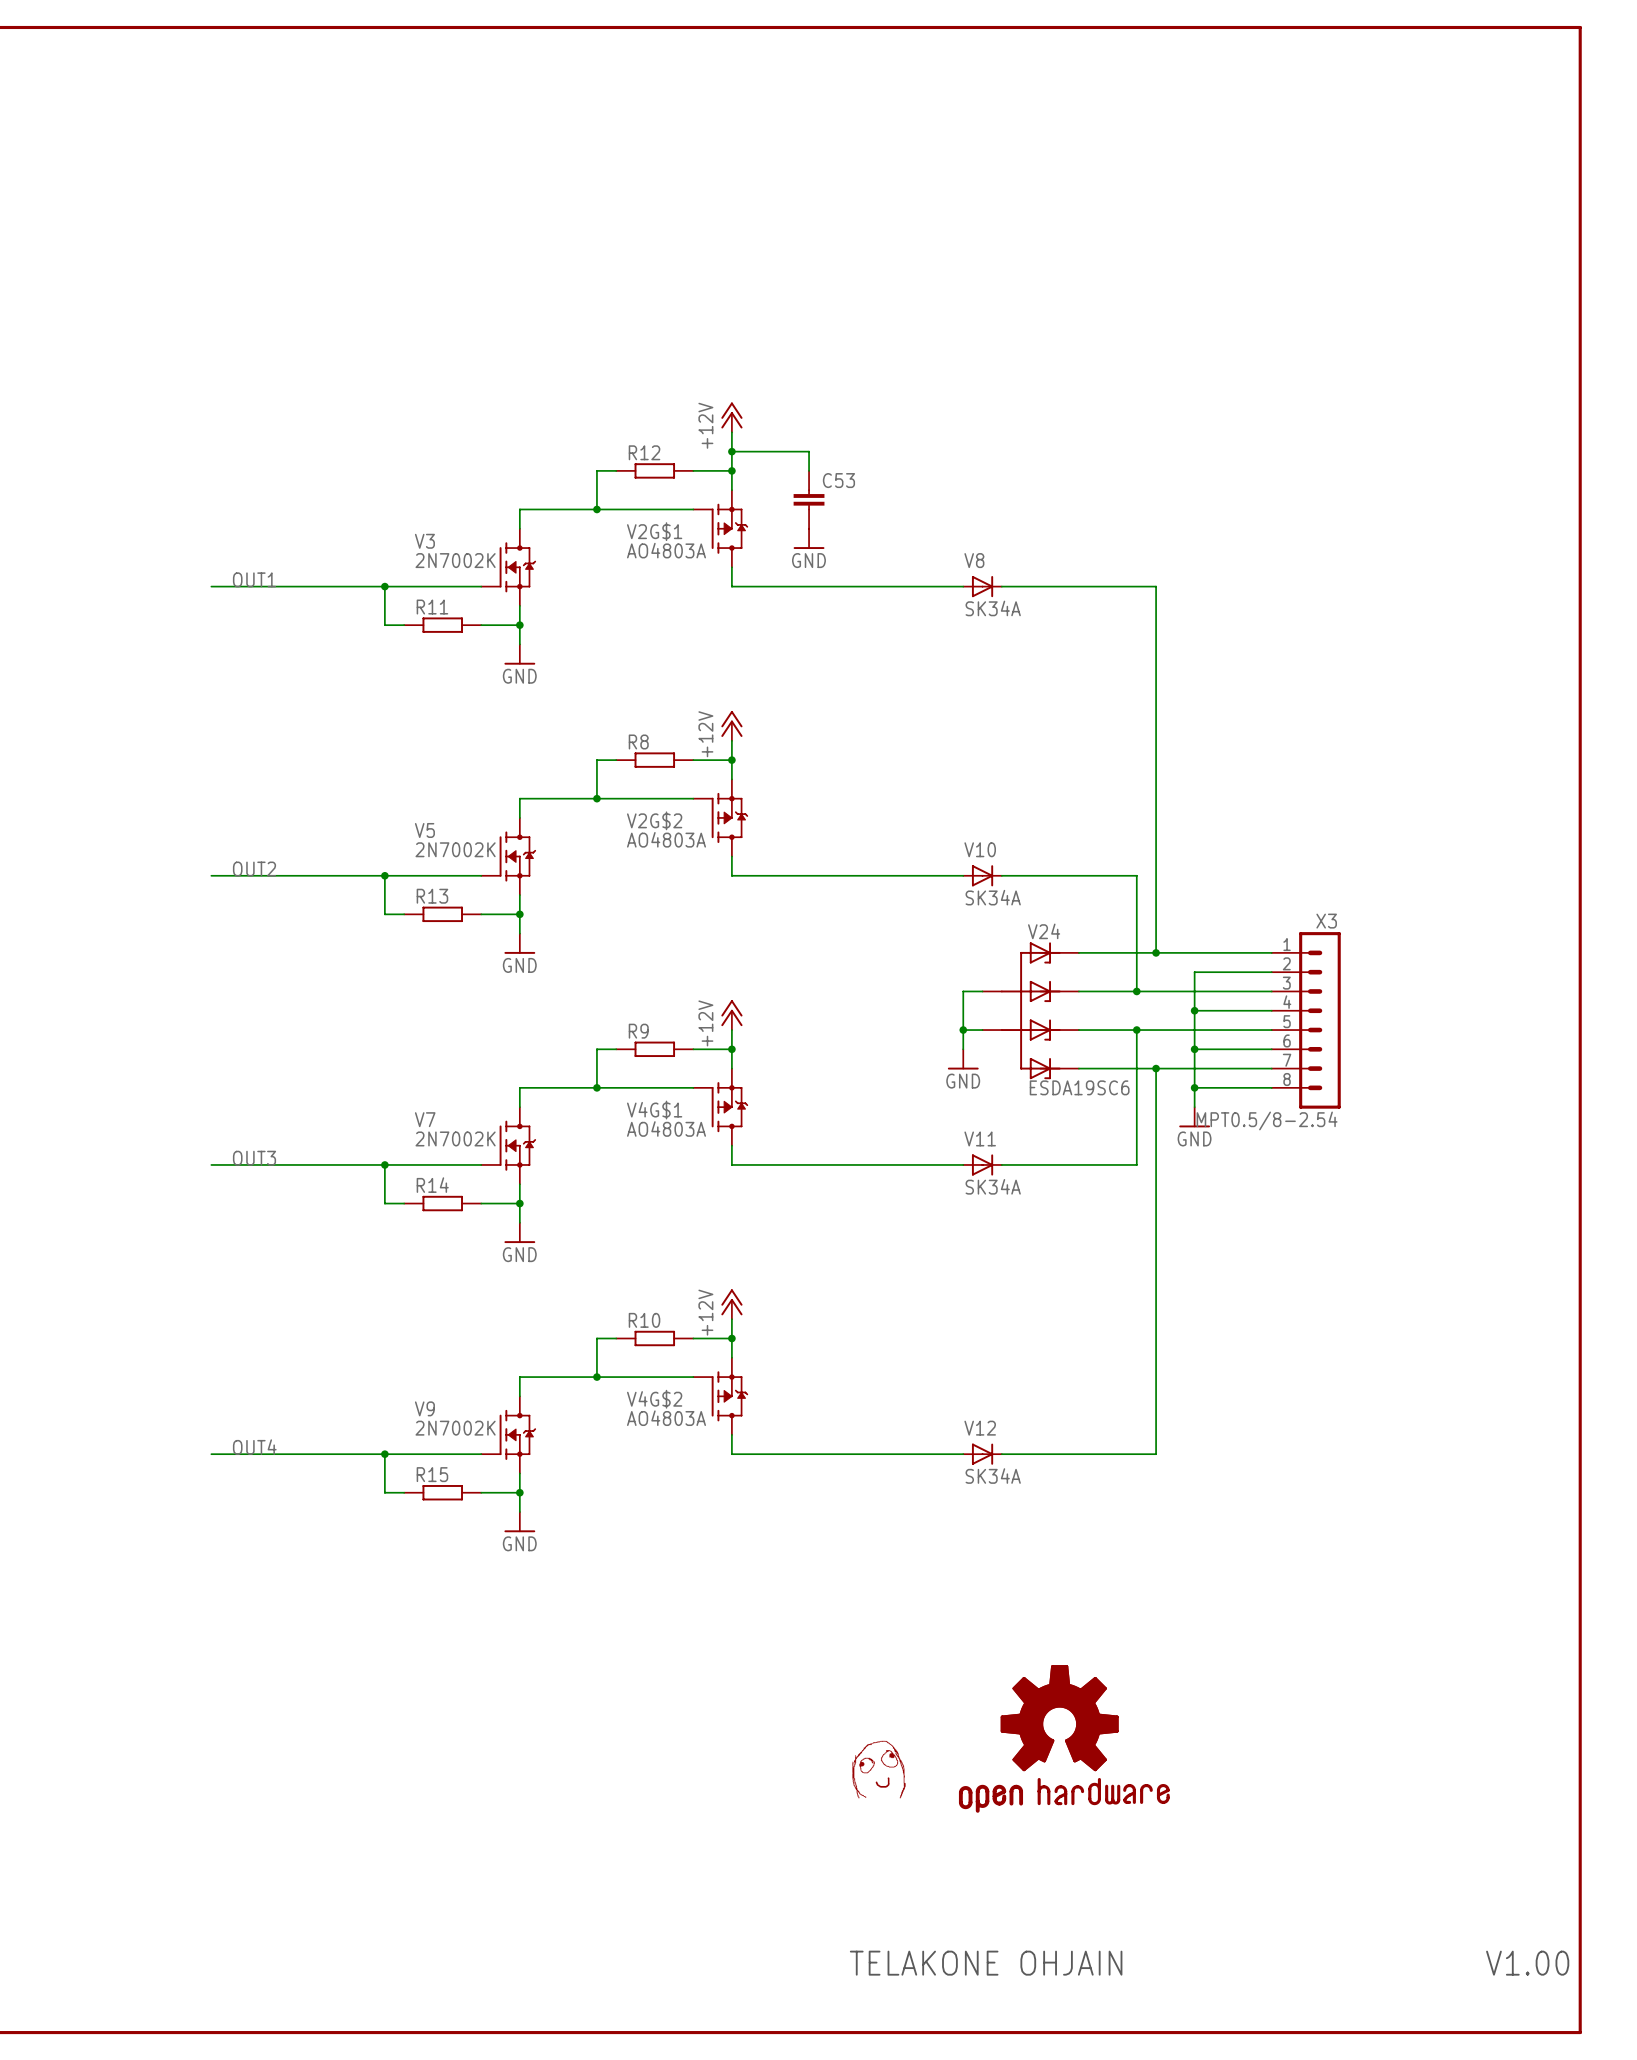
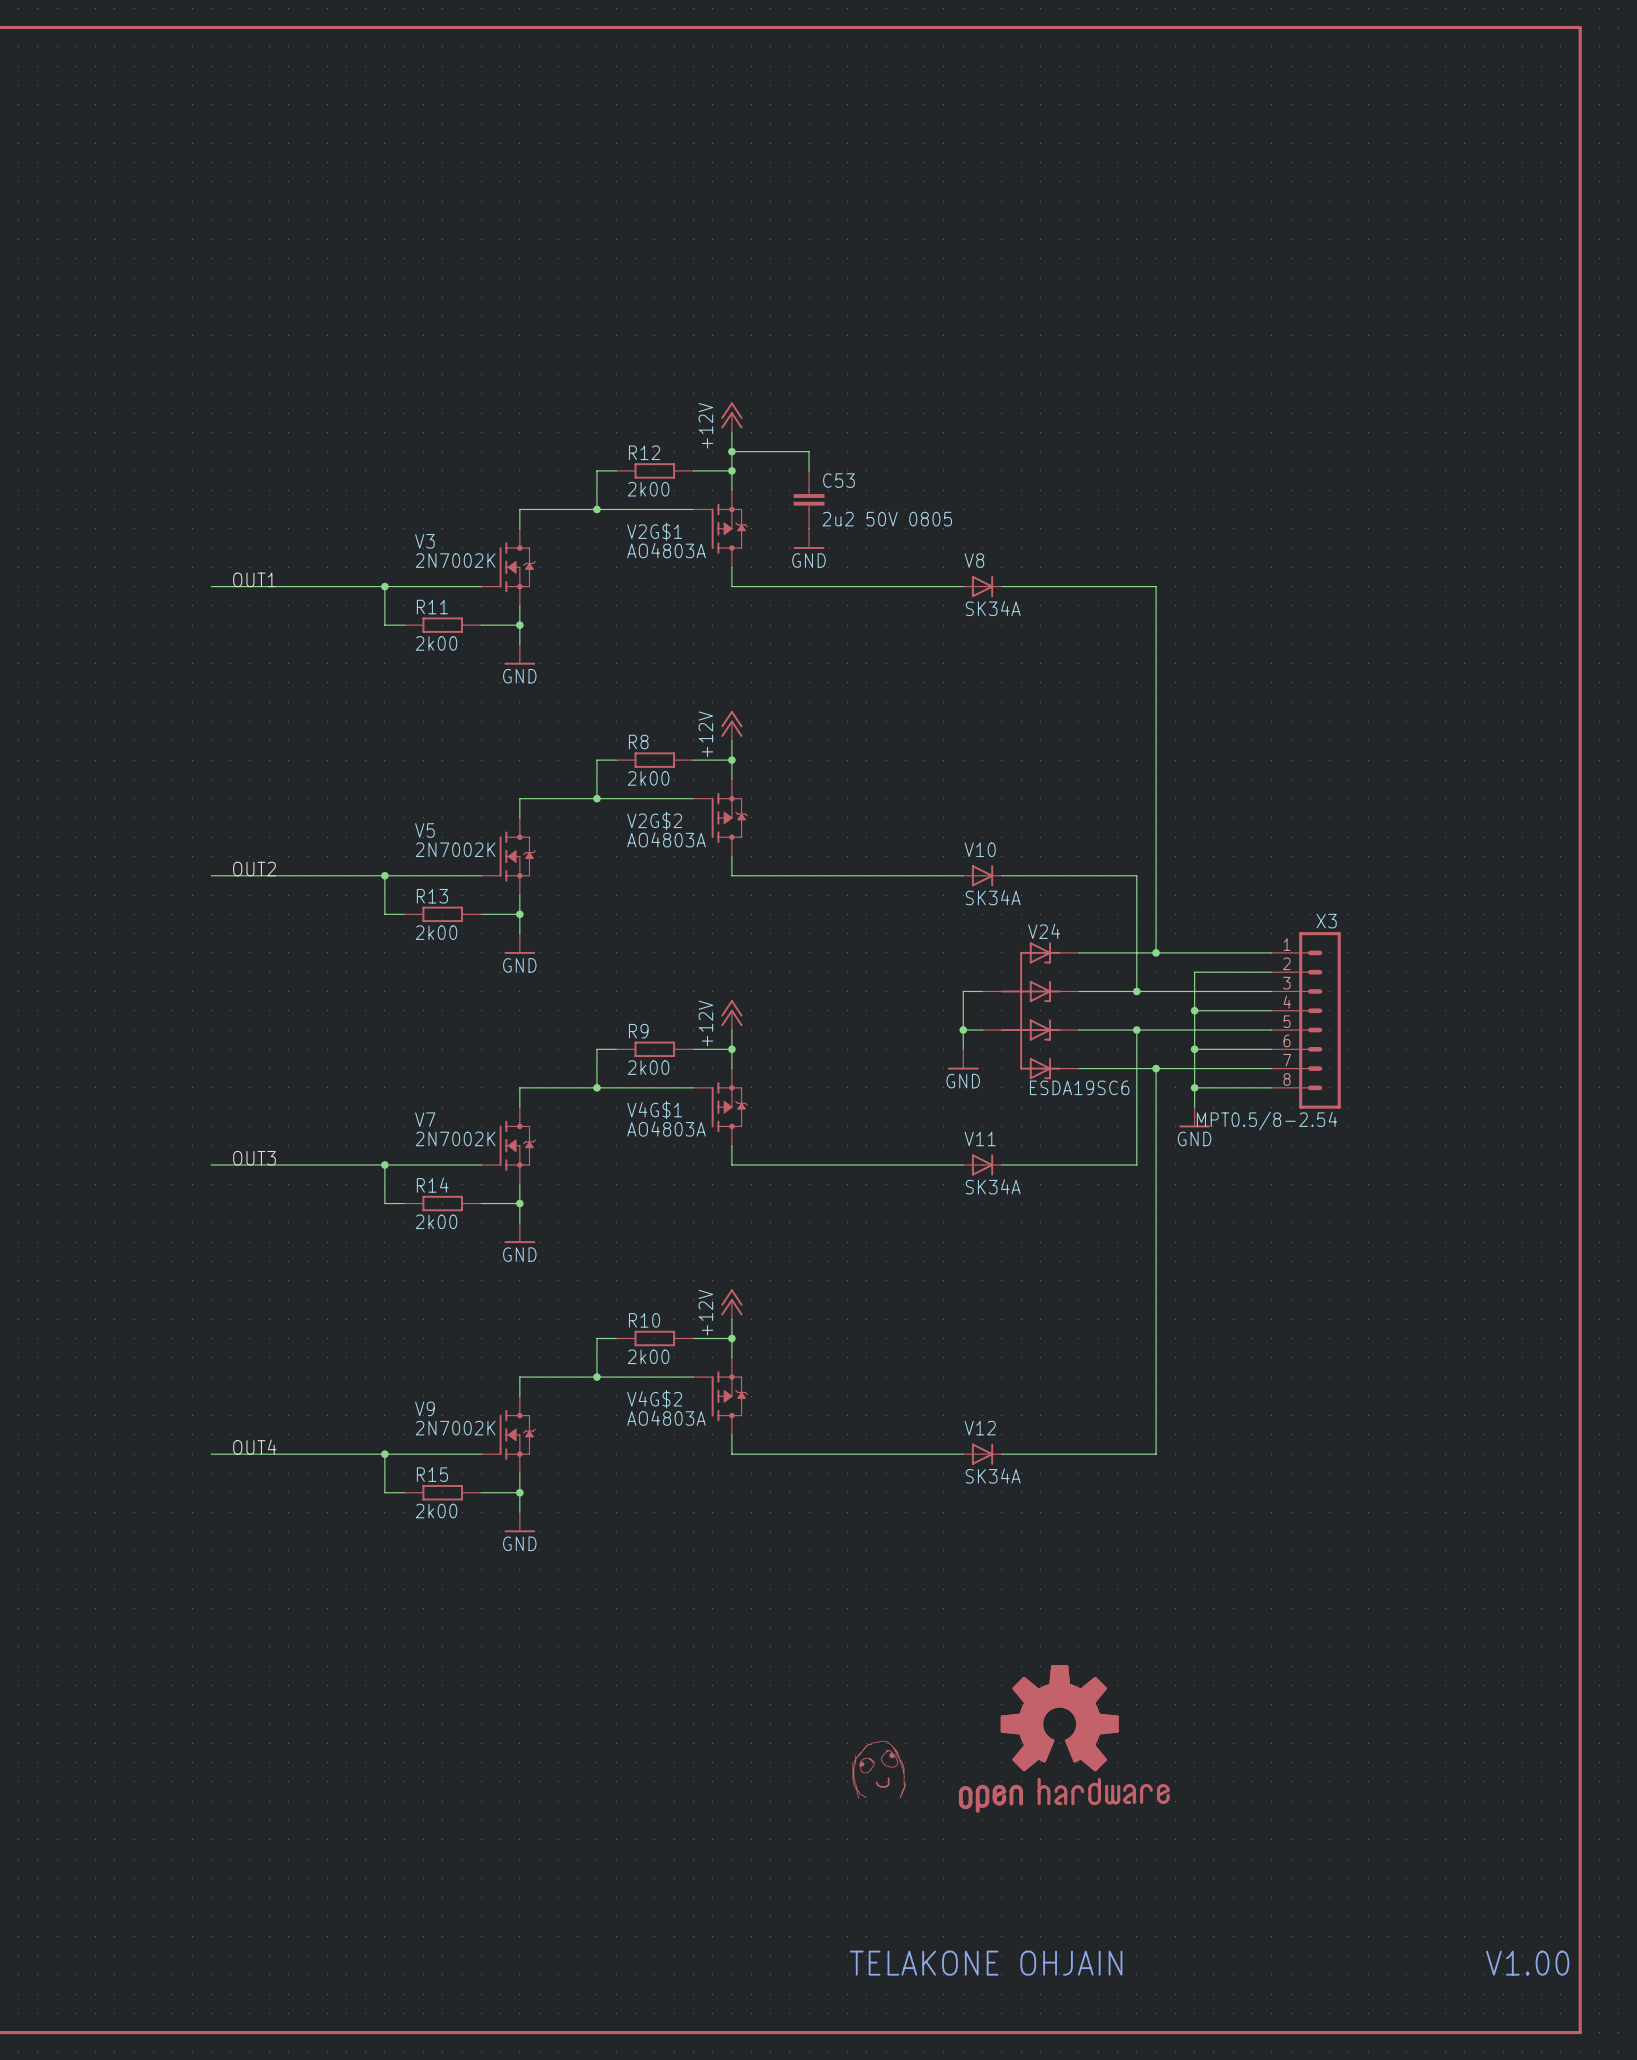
R12 value: none -> 2k00 (648, 489)
C53 value: none -> 2u2 50V 0805 (887, 519)
R11 value: none -> 2k00 (436, 643)
R8 value: none -> 2k00 (648, 778)
R13 value: none -> 2k00 (436, 932)
R9 value: none -> 2k00 (648, 1067)
R14 value: none -> 2k00 (436, 1221)
R10 value: none -> 2k00 (648, 1356)
R15 value: none -> 2k00 (436, 1511)

